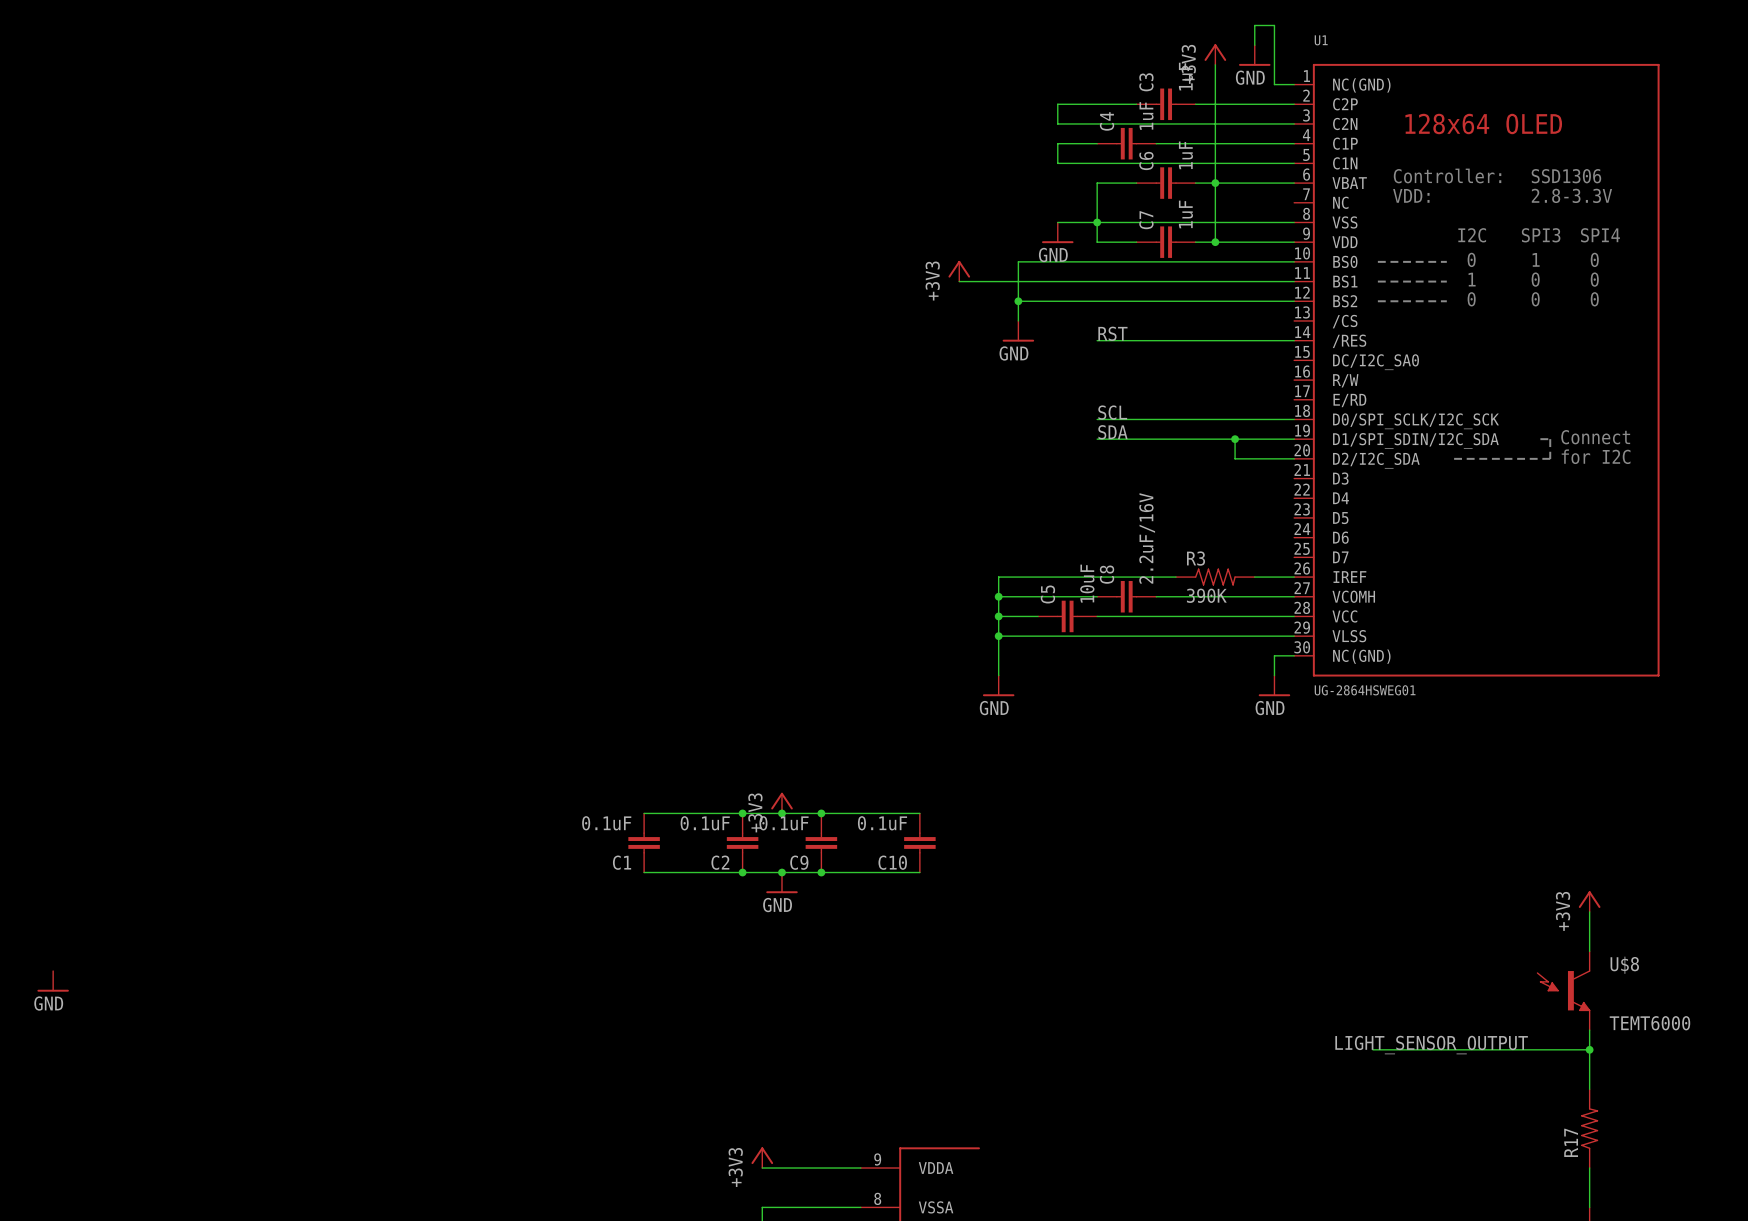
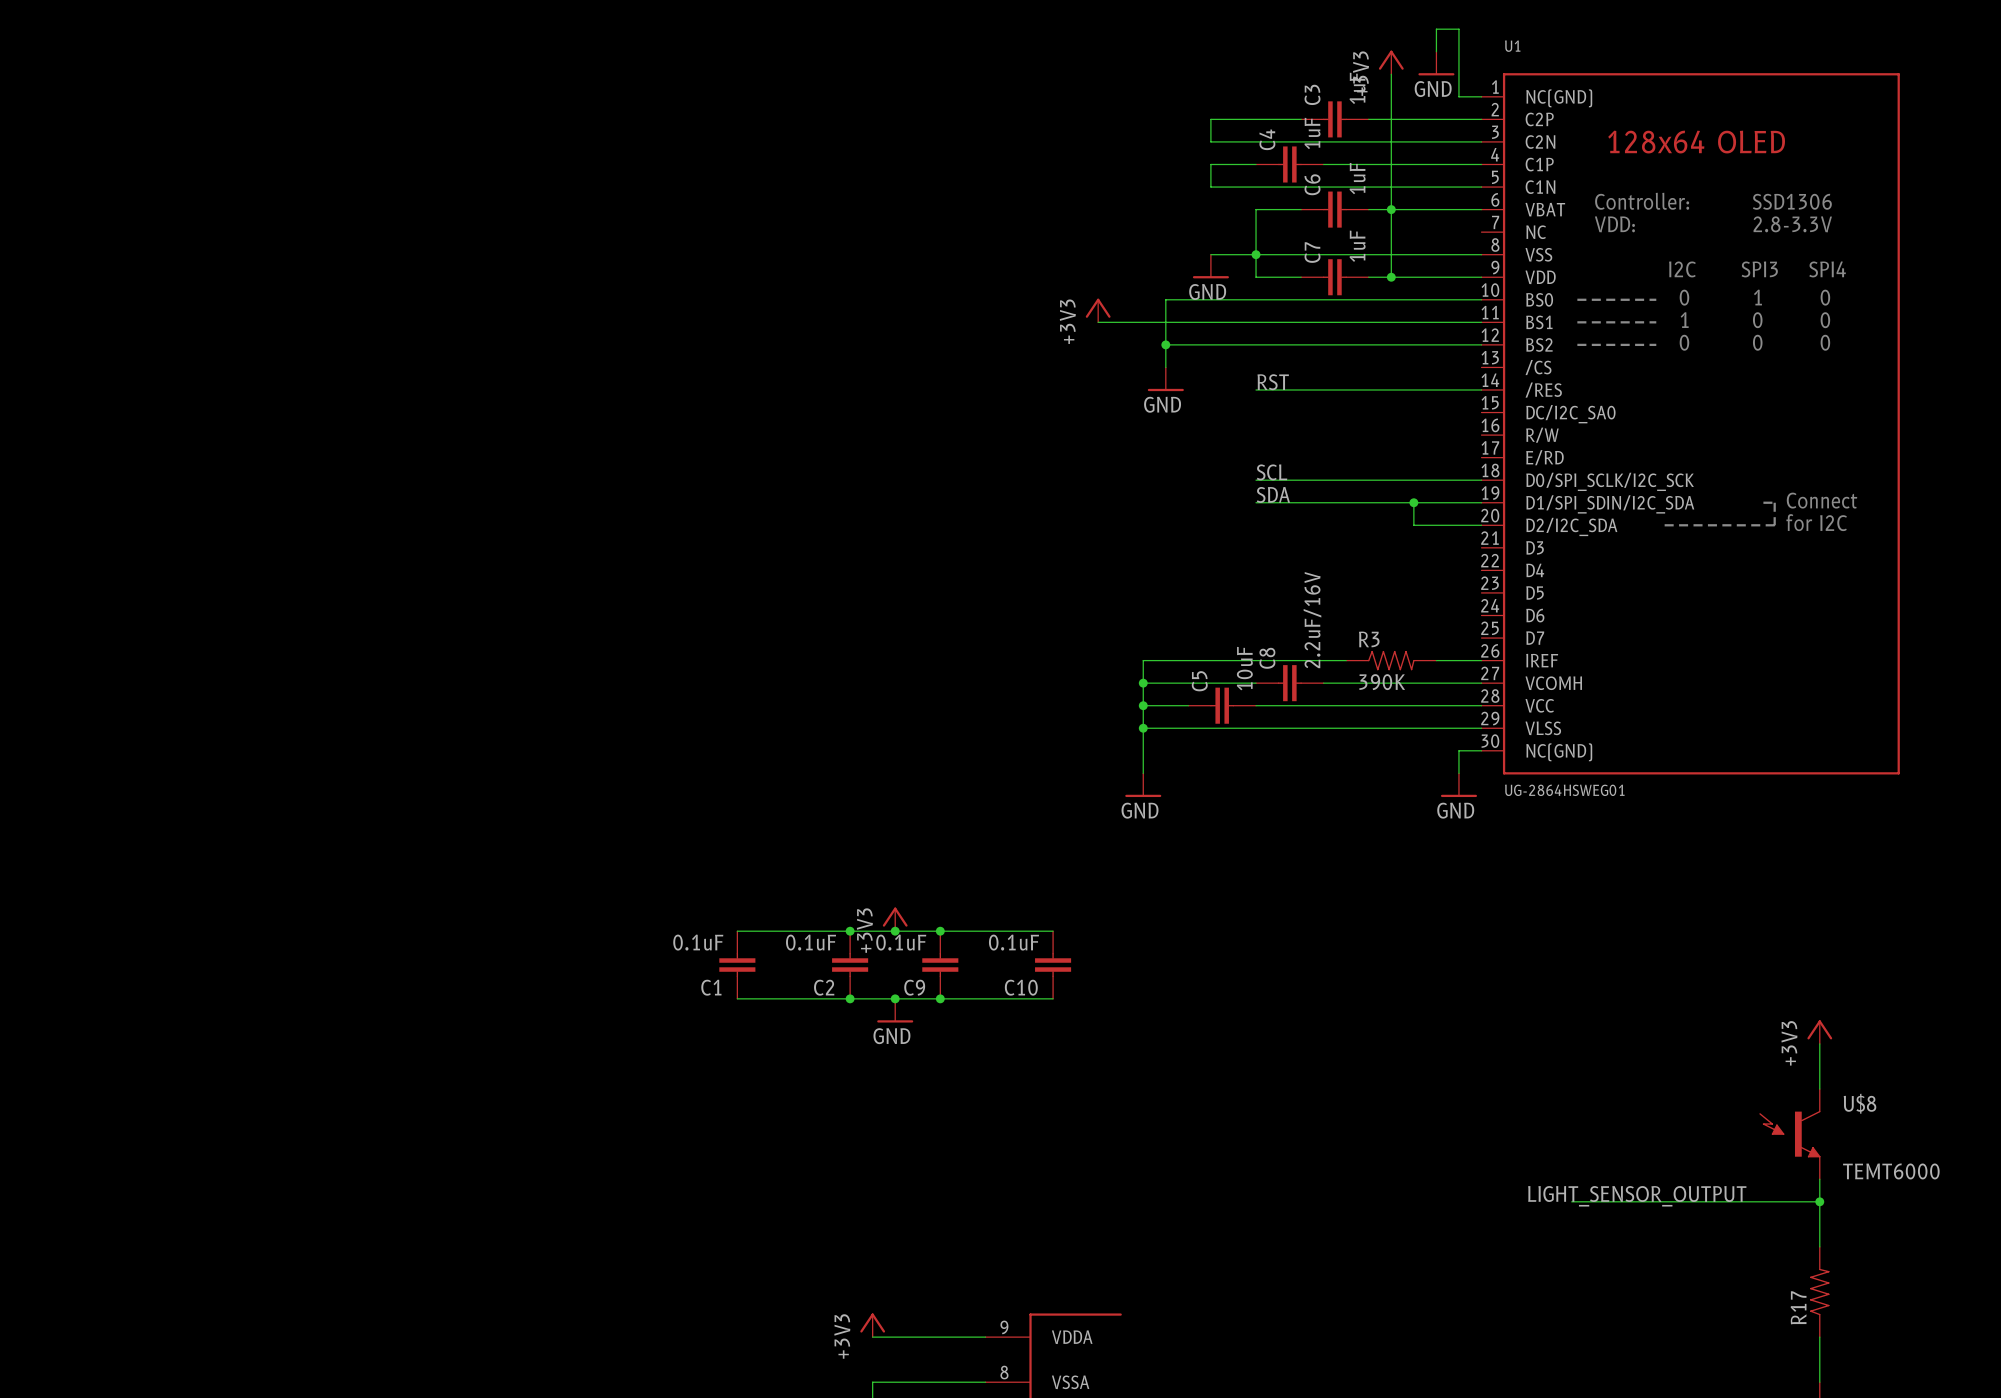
power symbol: GND (53, 981) -> none

